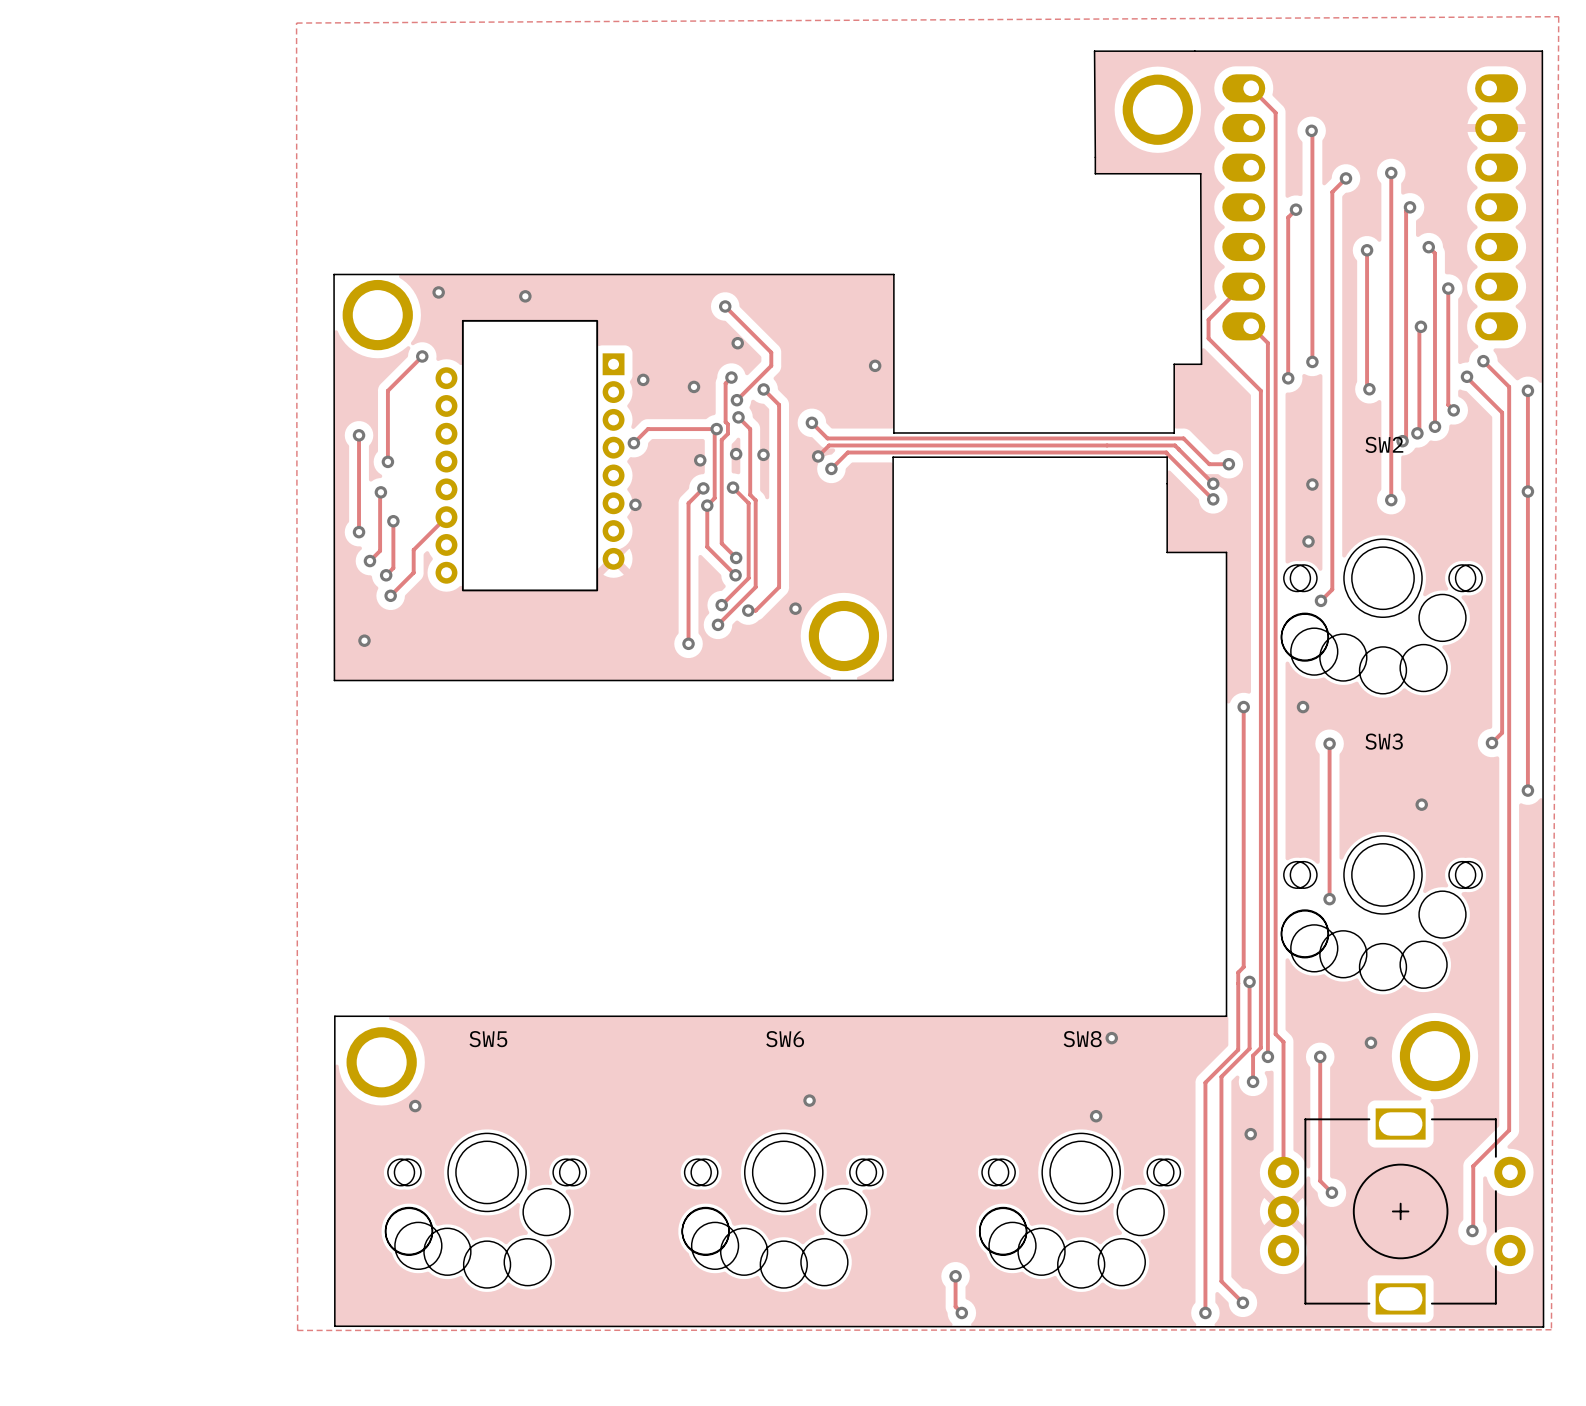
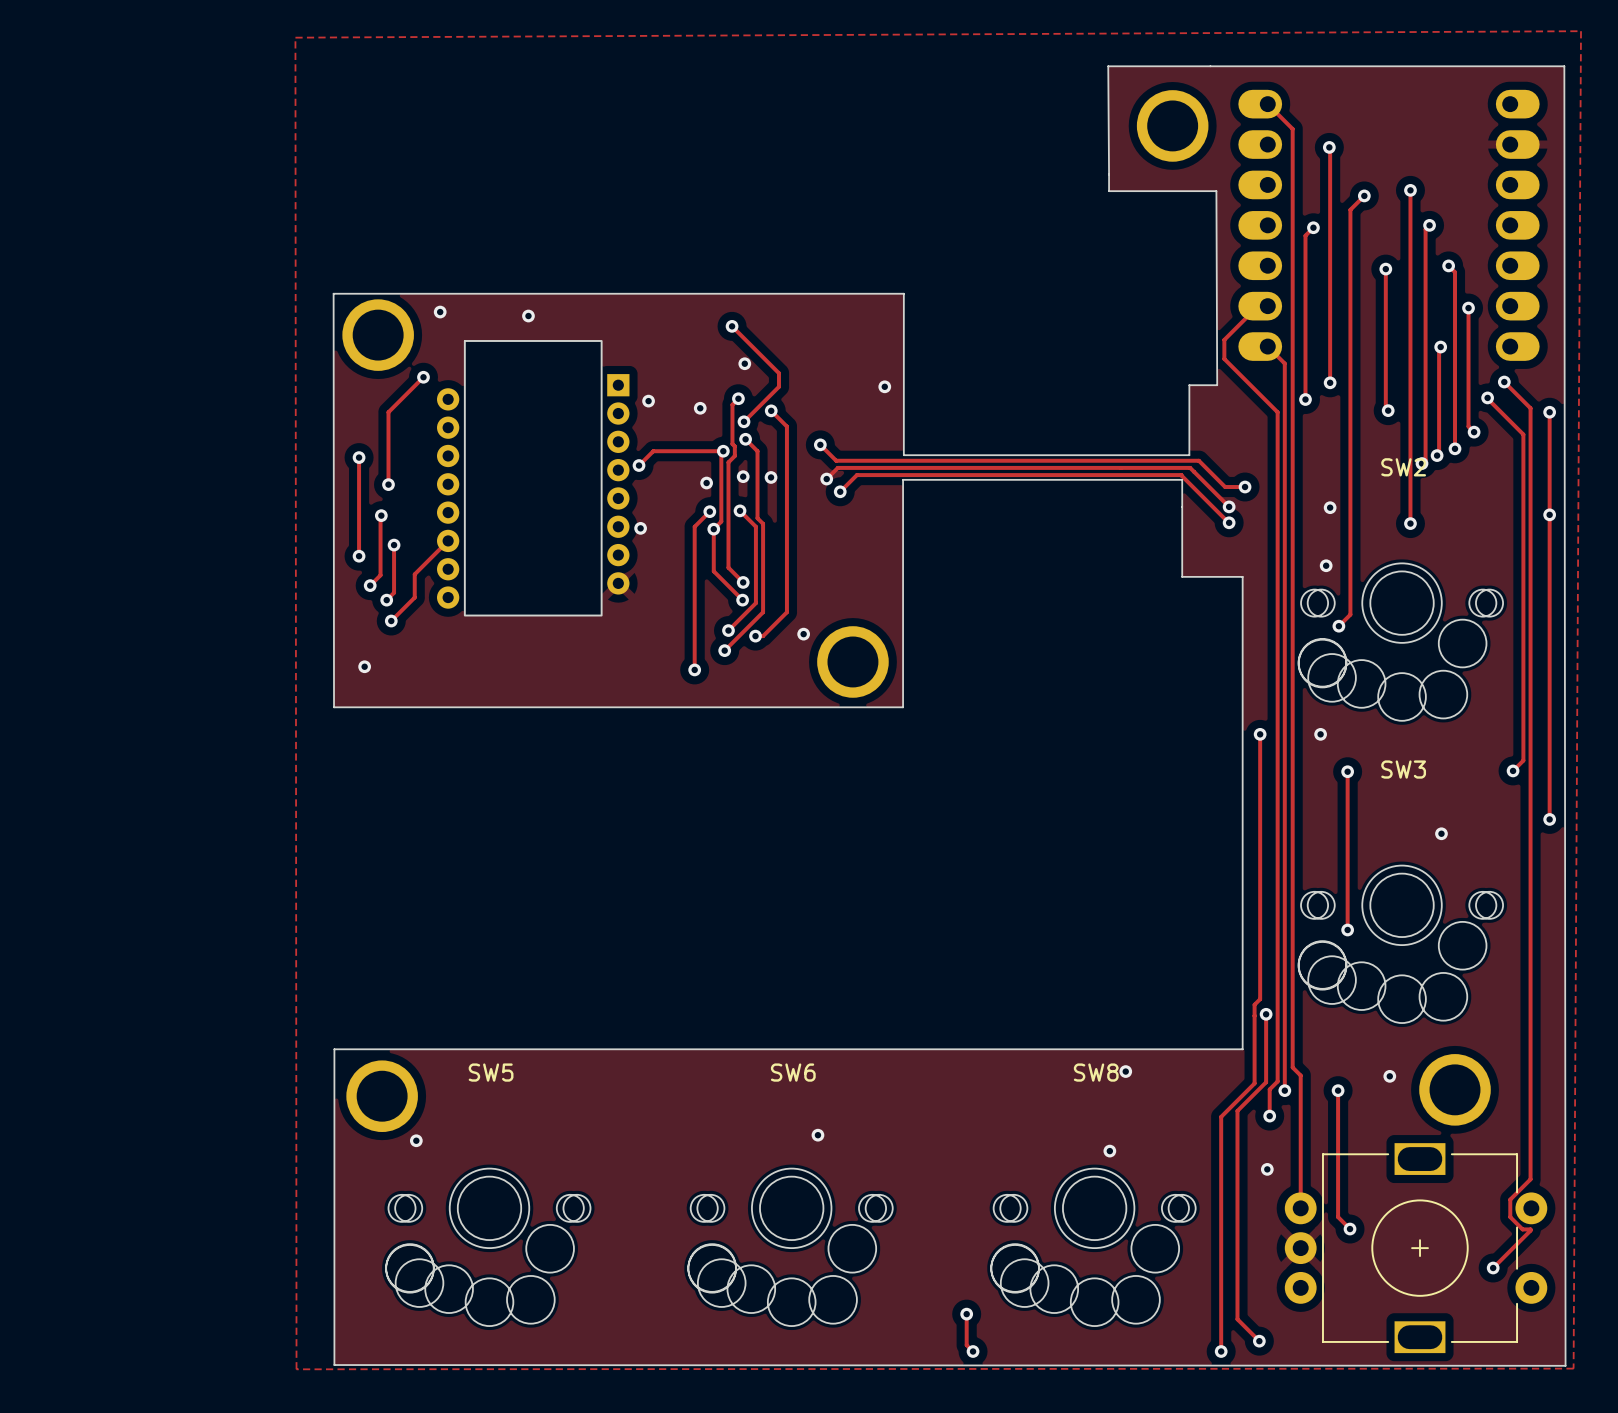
track: (1509, 1130) (1473, 1166) (1473, 1230) -> (1530, 1165) (1530, 1179) (1510, 1199) (1510, 1217) (1522, 1229) (1530, 1230) (1493, 1267)

